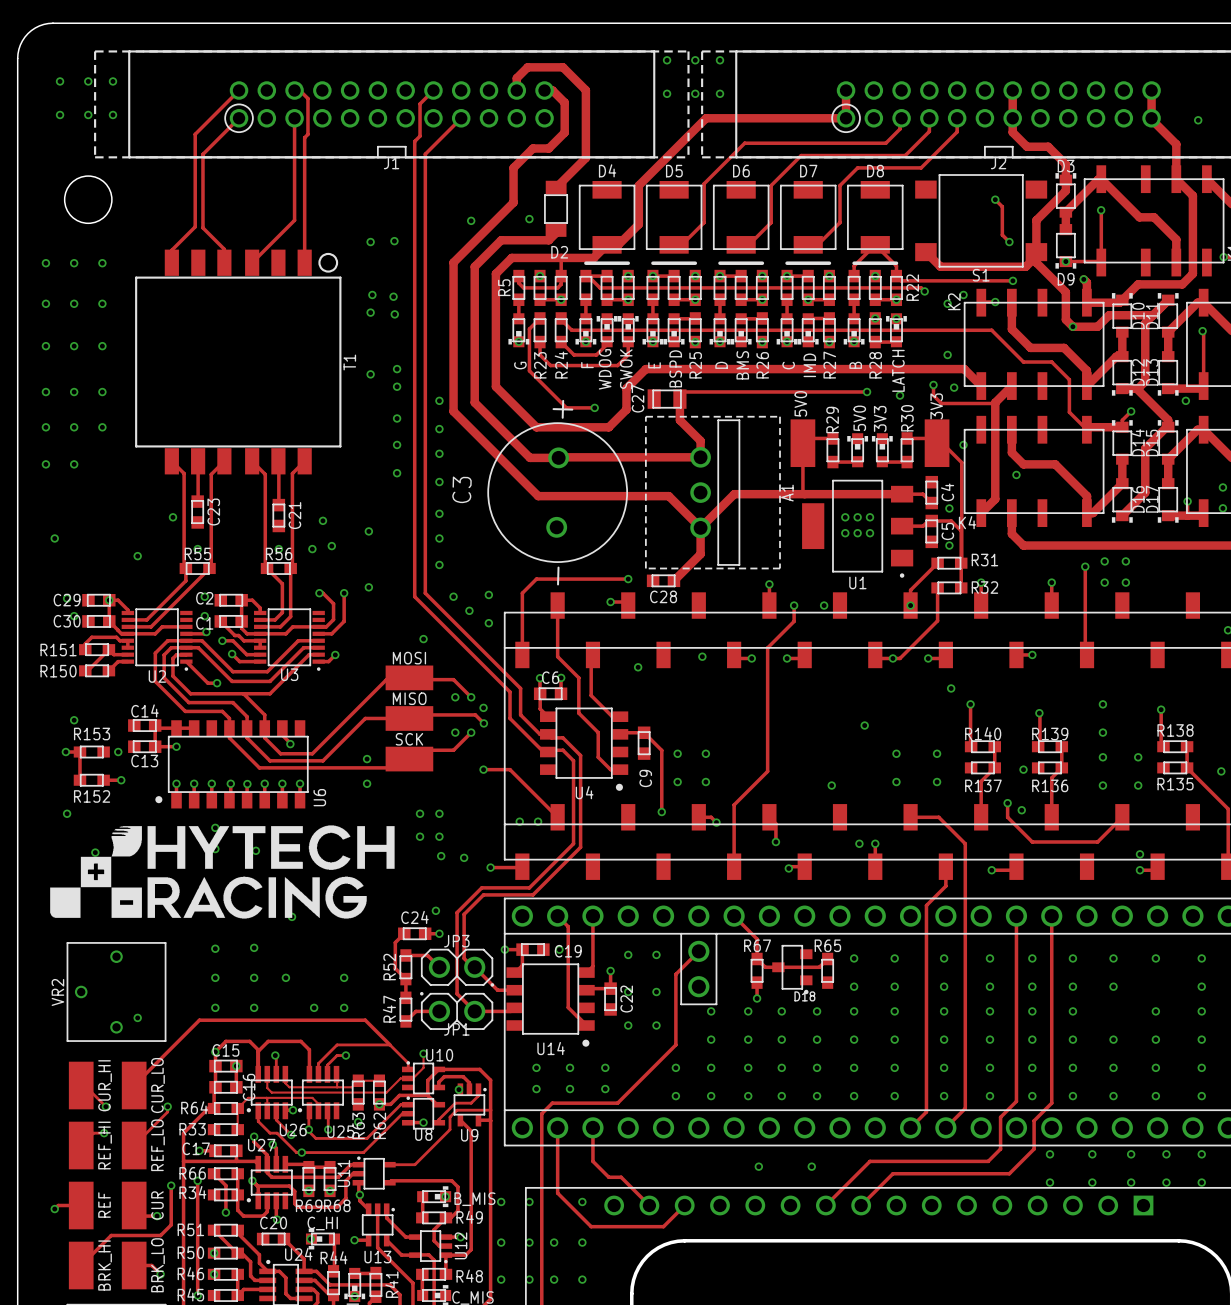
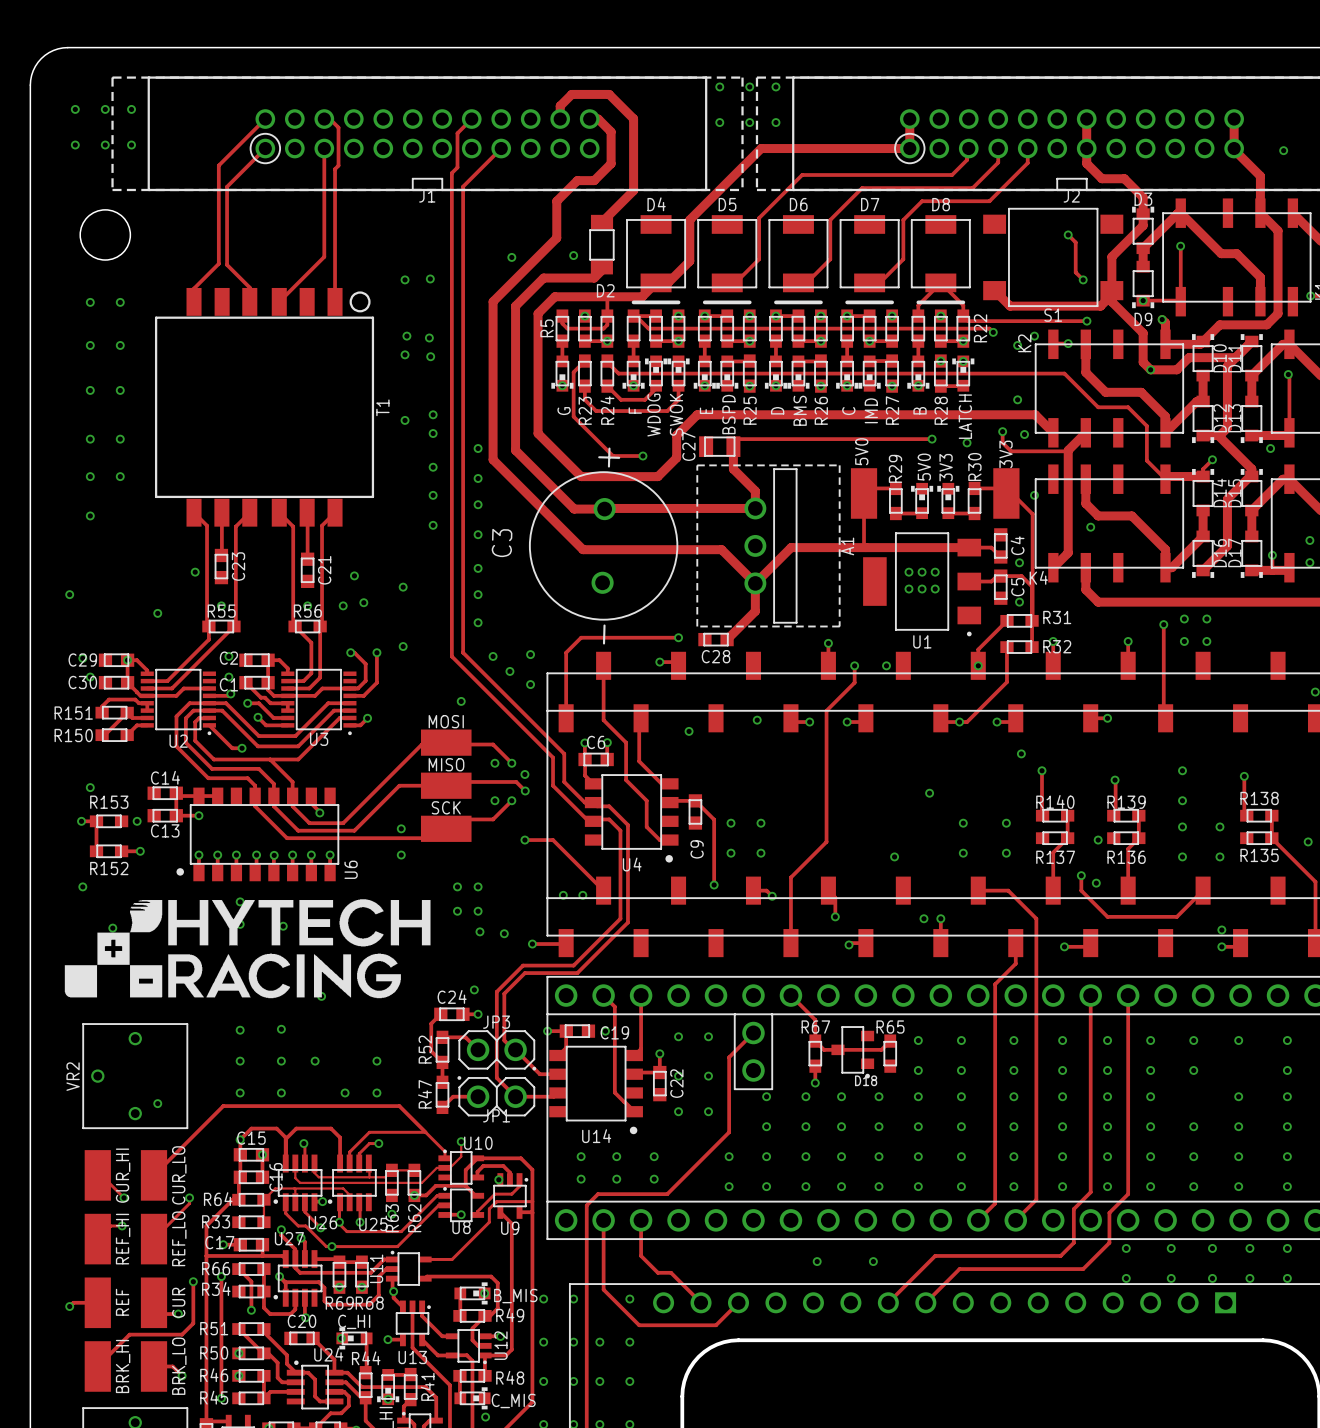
via: (45, 263) -> none
via: (45, 303) -> none
via: (45, 346) -> none
via: (45, 392) -> none
via: (45, 427) -> none
via: (45, 464) -> none

